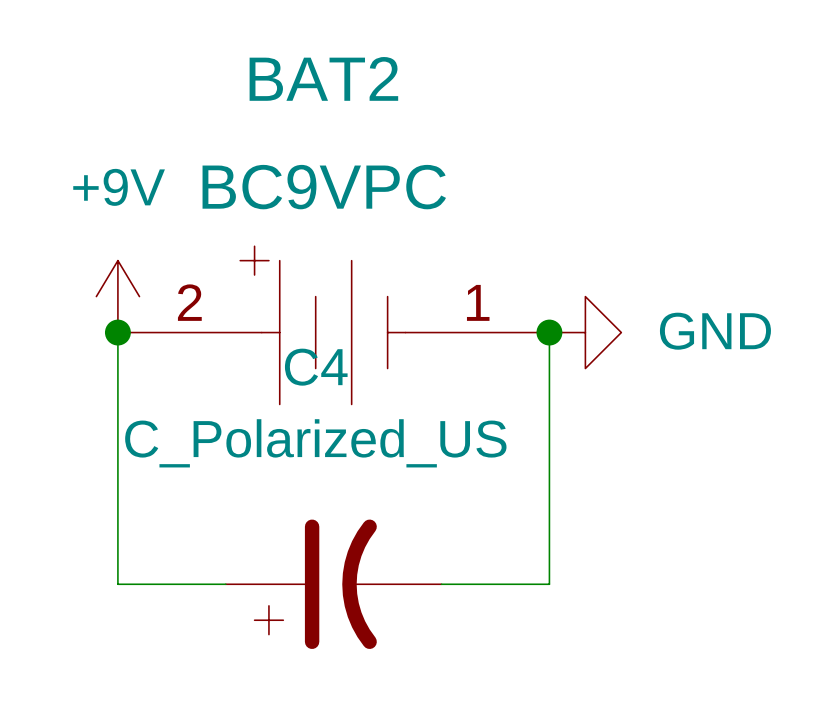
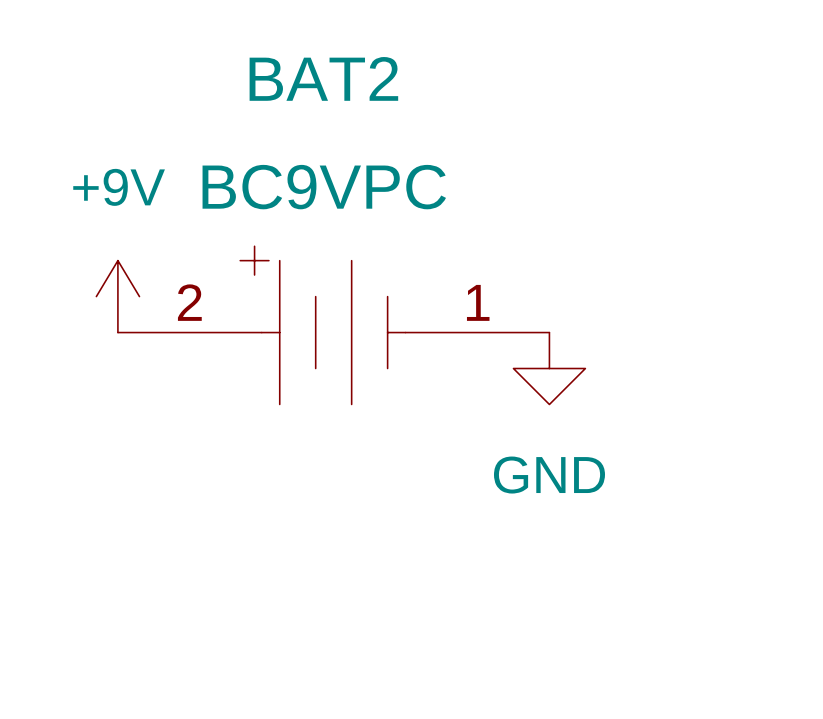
wire: (117, 332) (117, 584) (225, 584) -> none
junction: (117, 332) -> none
wire: (549, 332) (549, 584) (441, 584) -> none
junction: (549, 332) -> none
power symbol rotation: 0° (585, 332) -> 90° clockwise (549, 368)
power symbol position: GND (585, 332) -> GND (549, 368)
C4: C_Polarized_US (333, 584) -> none

